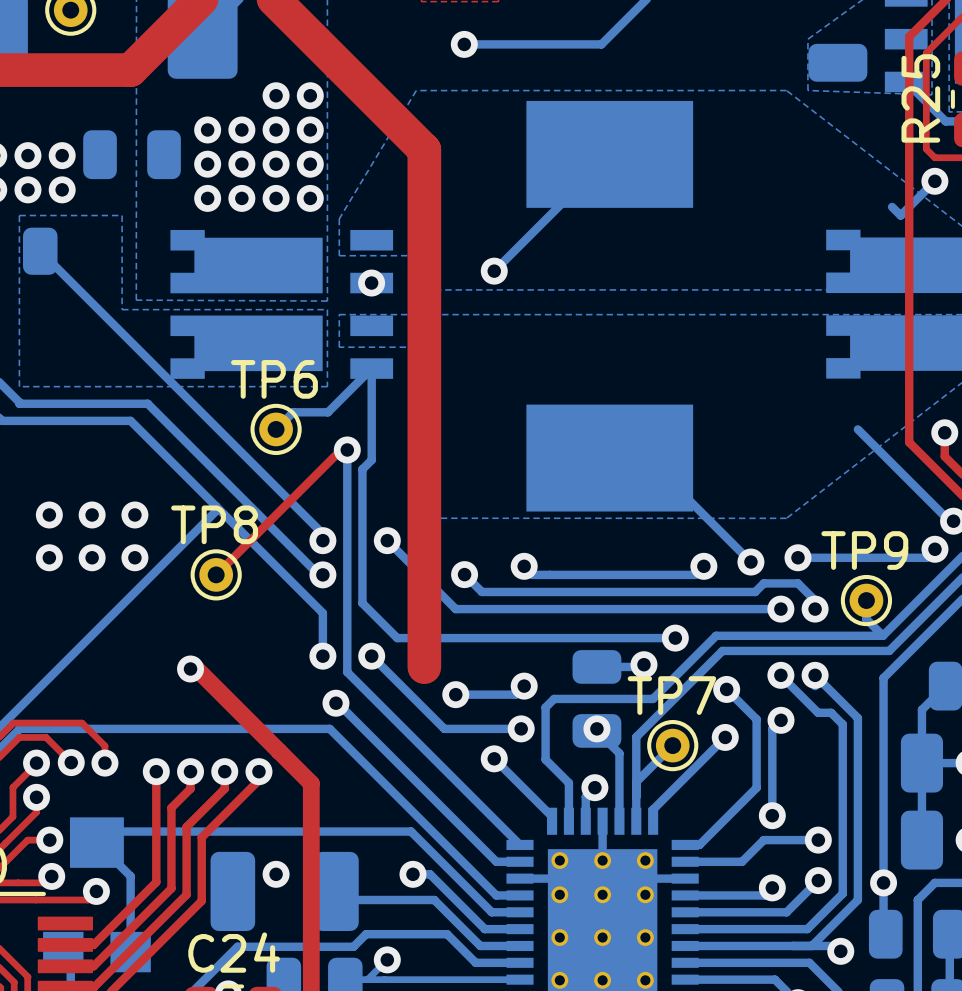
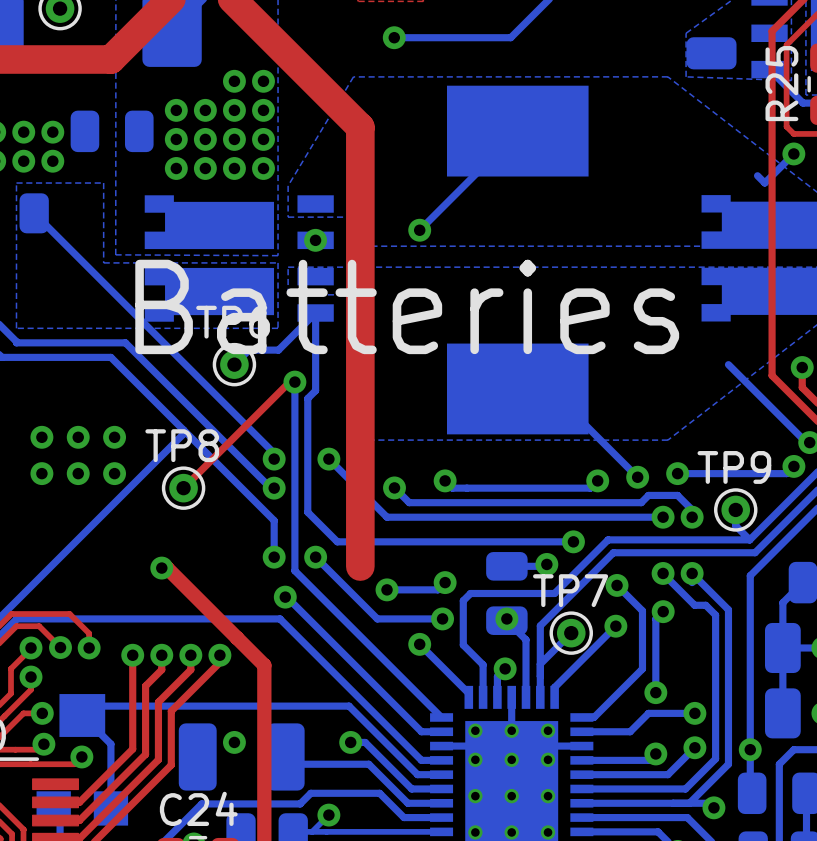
text: none -> Batteries (407, 306)

